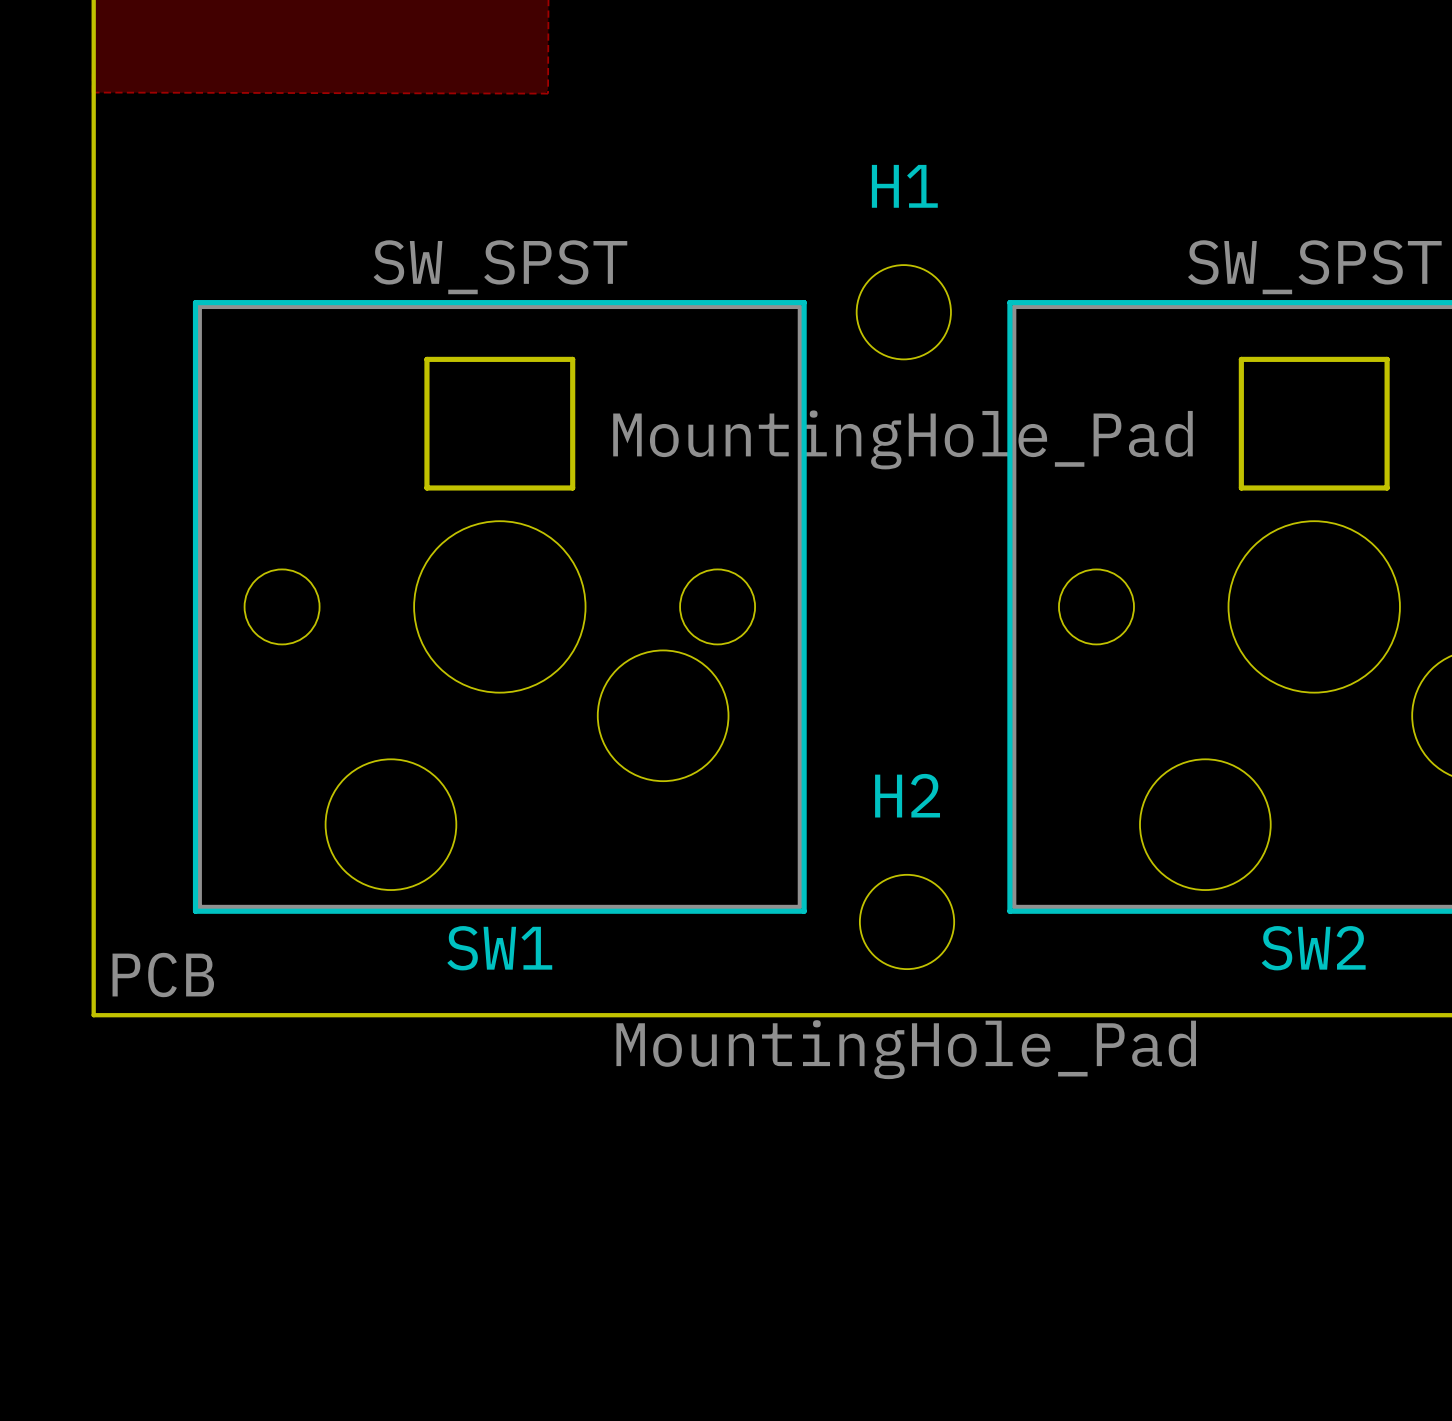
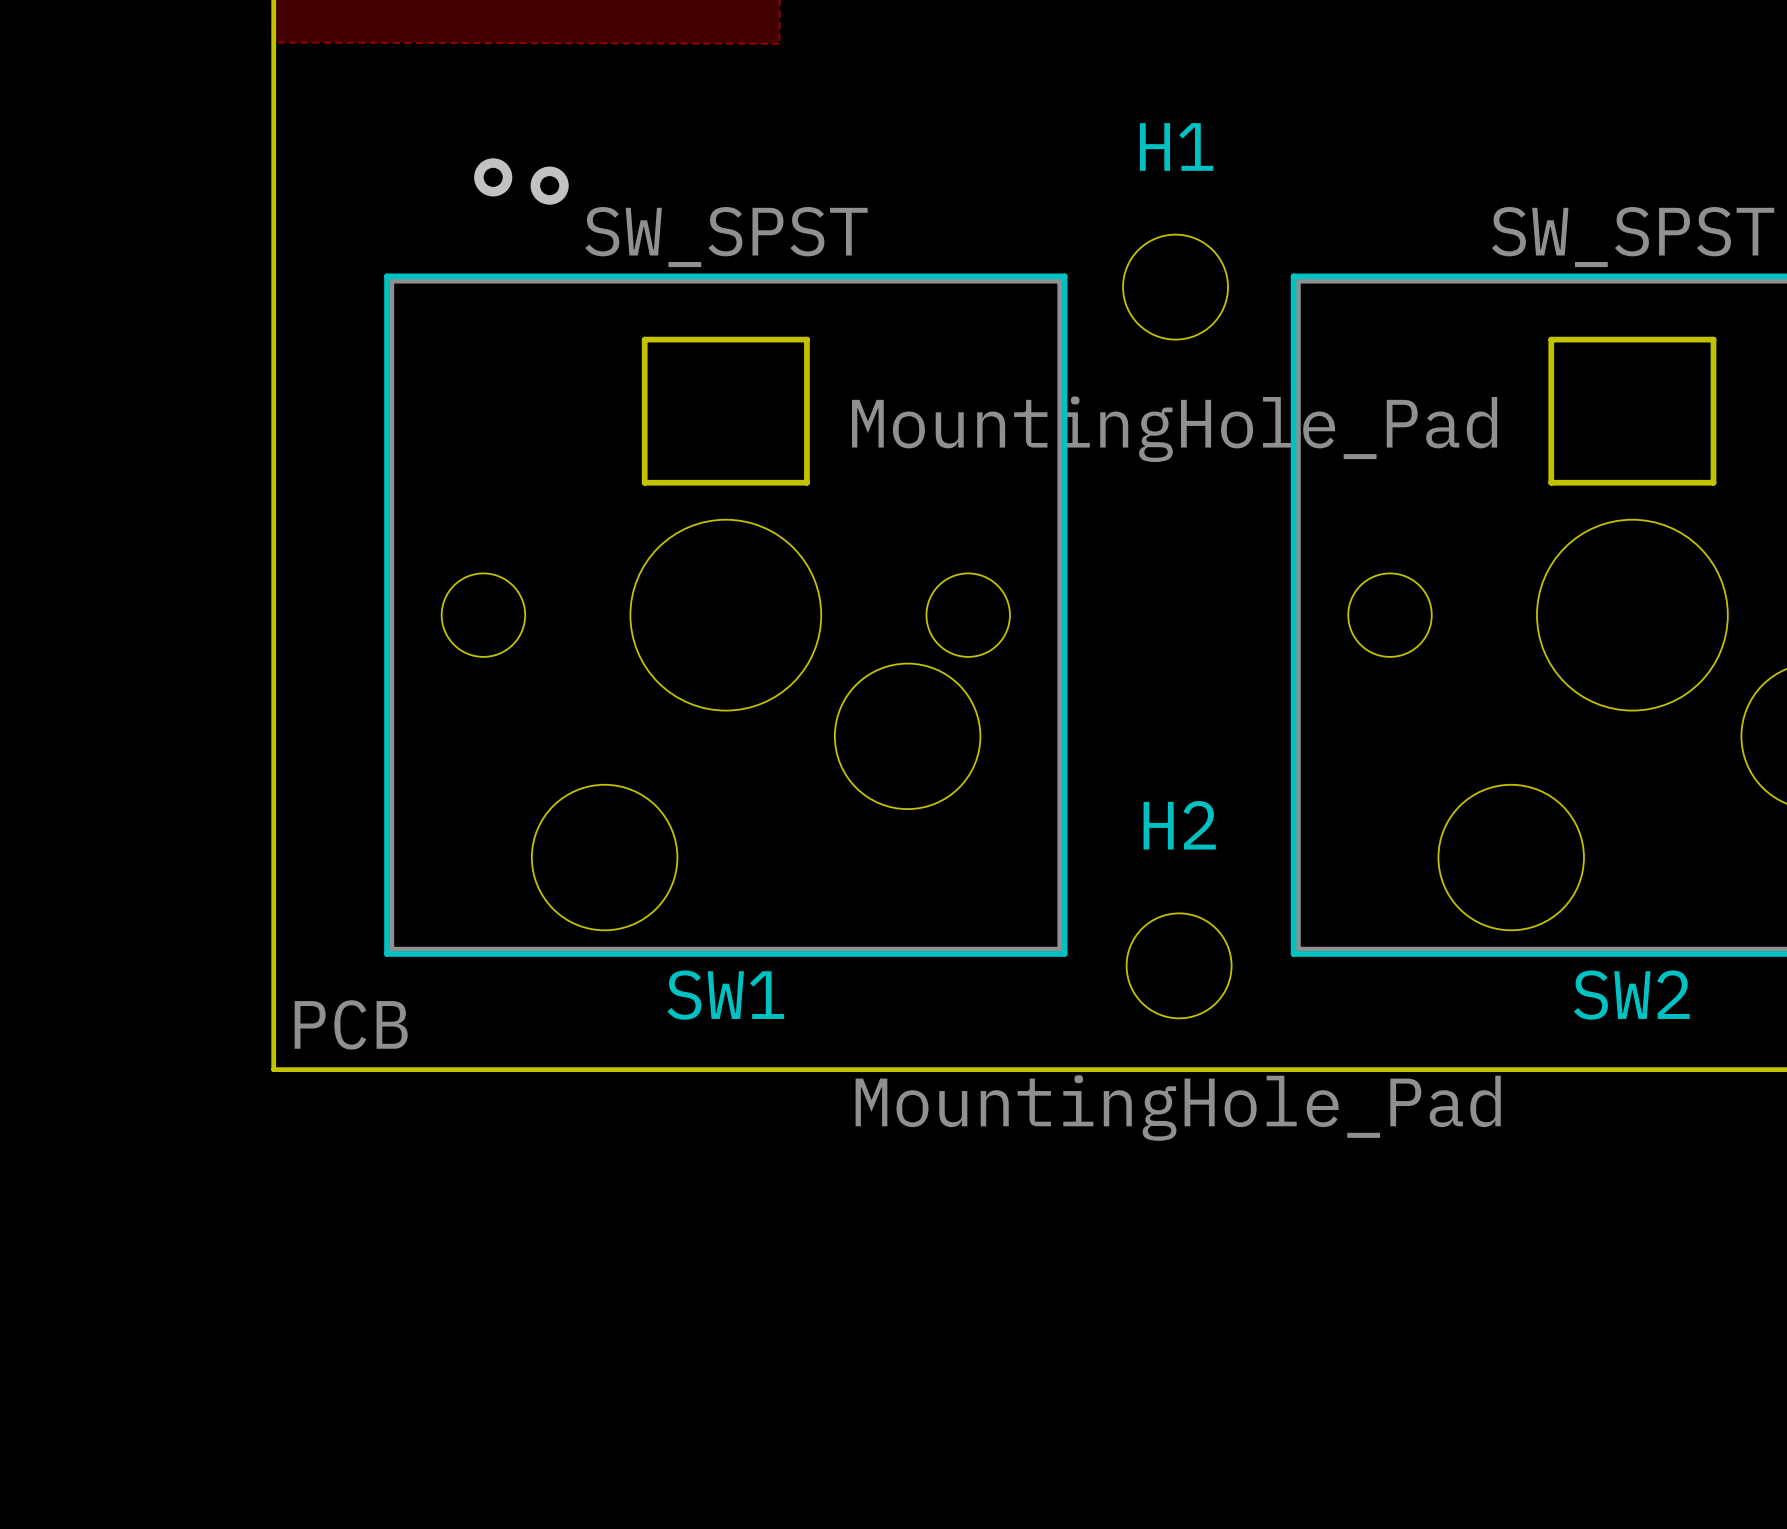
via: none -> (493, 177)
via: none -> (549, 185)

